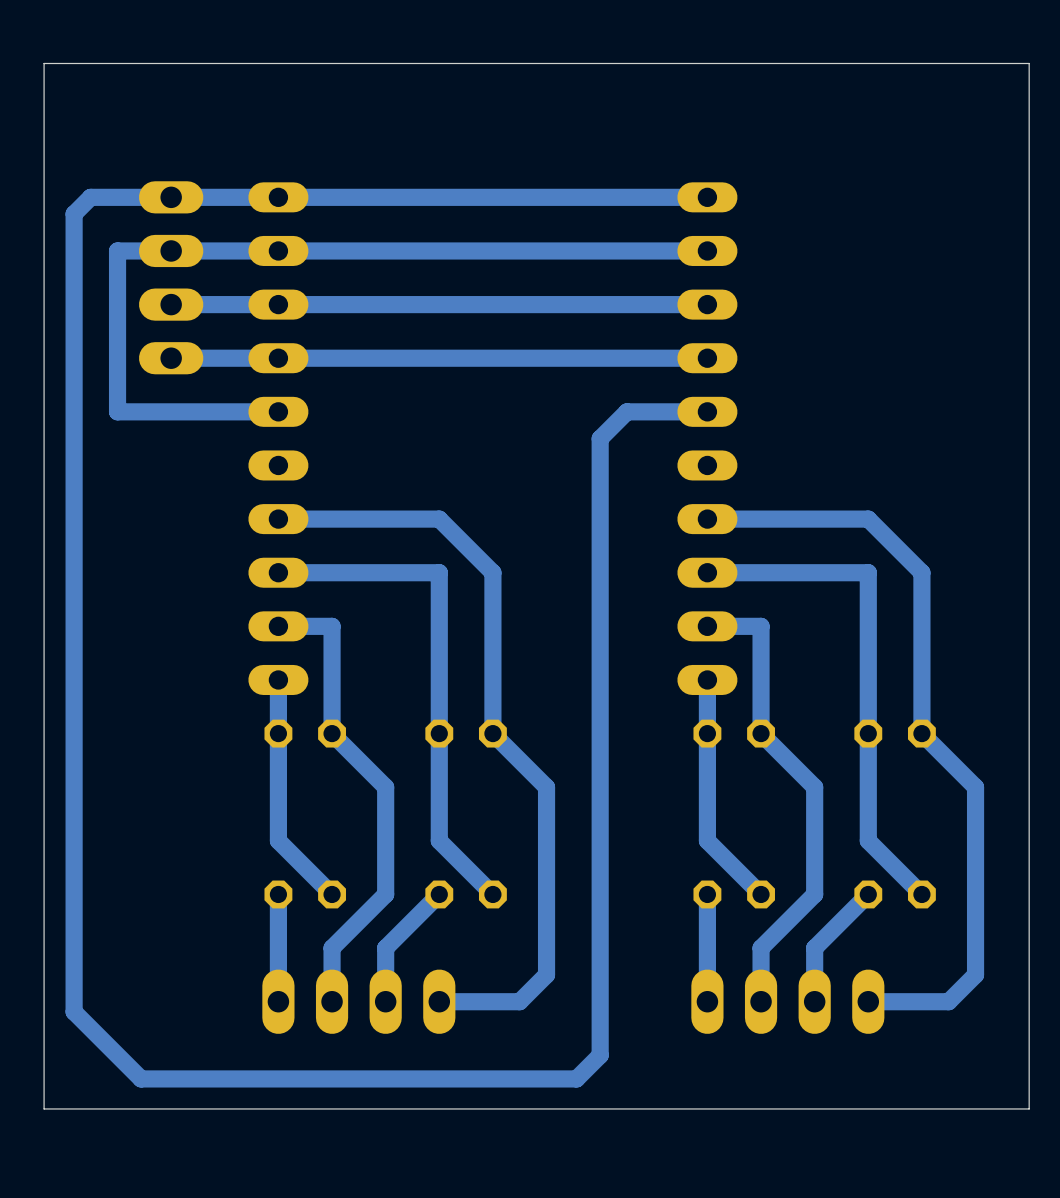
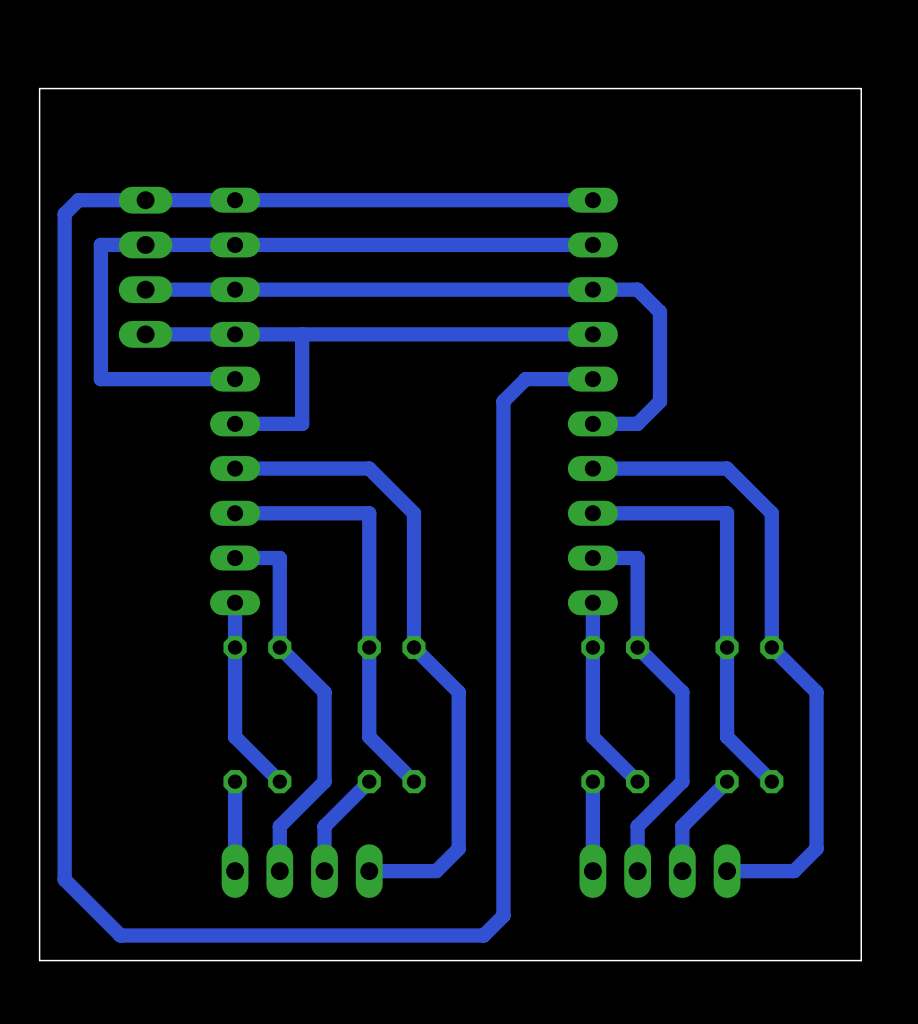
bottom track: none -> (592, 289) (637, 289) (659, 312) (659, 401) (637, 423) (592, 423)
bottom track: none -> (302, 334) (302, 423) (235, 423)

